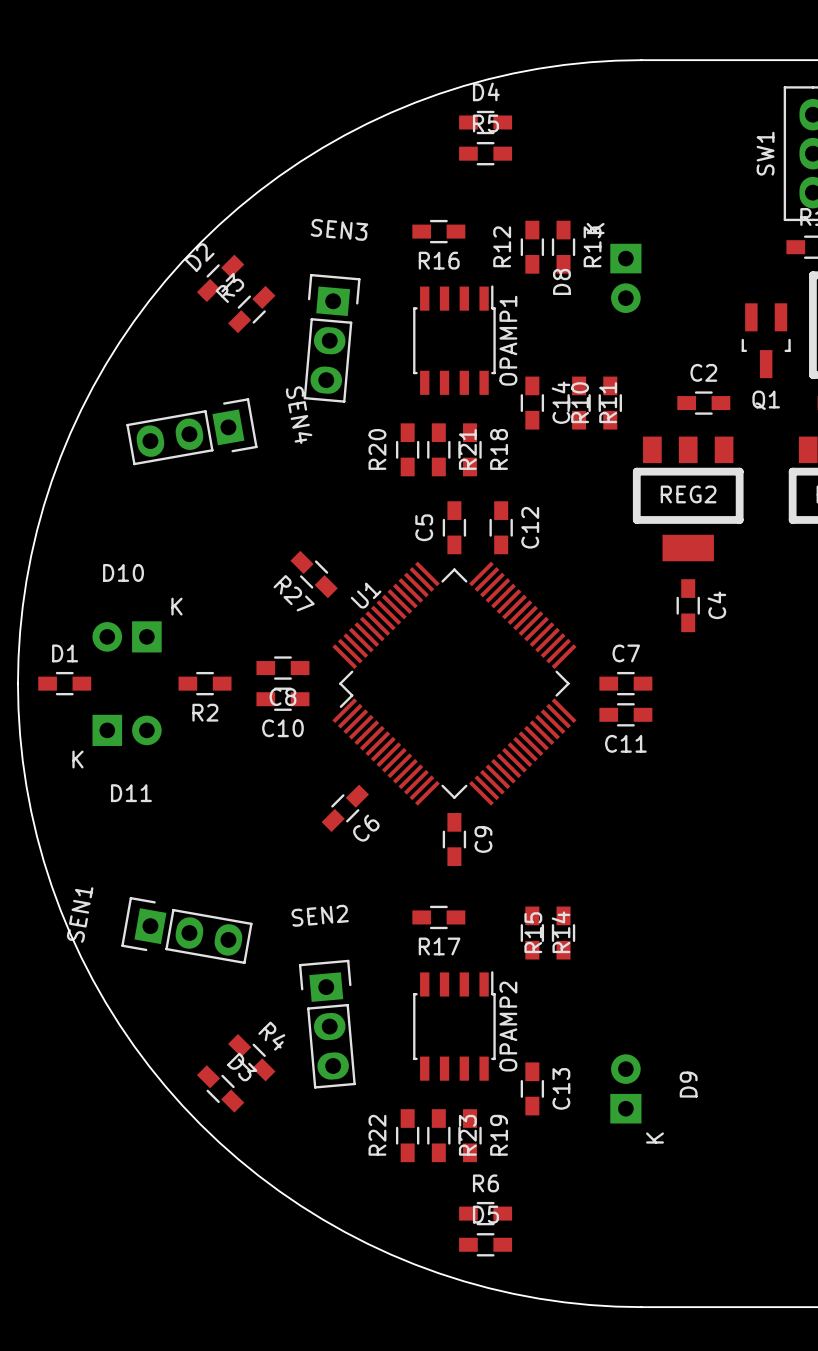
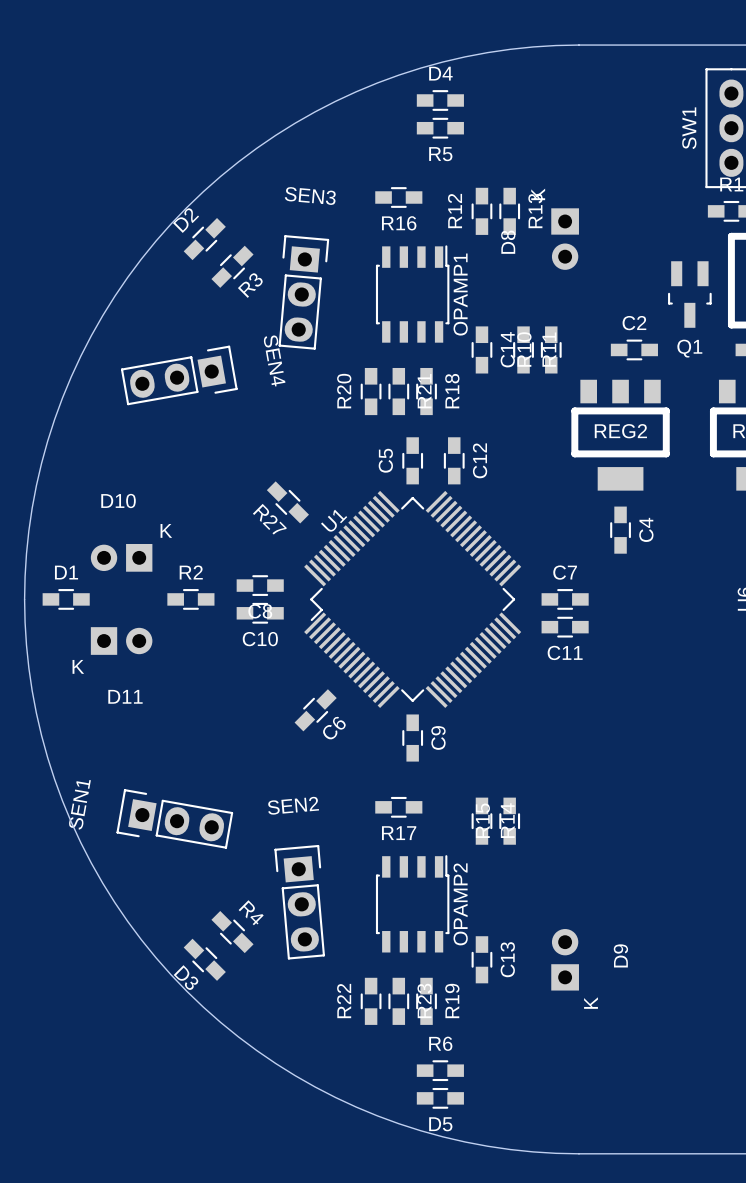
R5 name position: R5 (485, 123) -> R5 (440, 154)
R3 name position: R3 (229, 287) -> R3 (250, 285)
R2 name position: R2 (205, 712) -> R2 (191, 572)
D3 name position: D3 (242, 1067) -> D3 (186, 977)
D5 name position: D5 (485, 1214) -> D5 (440, 1124)

